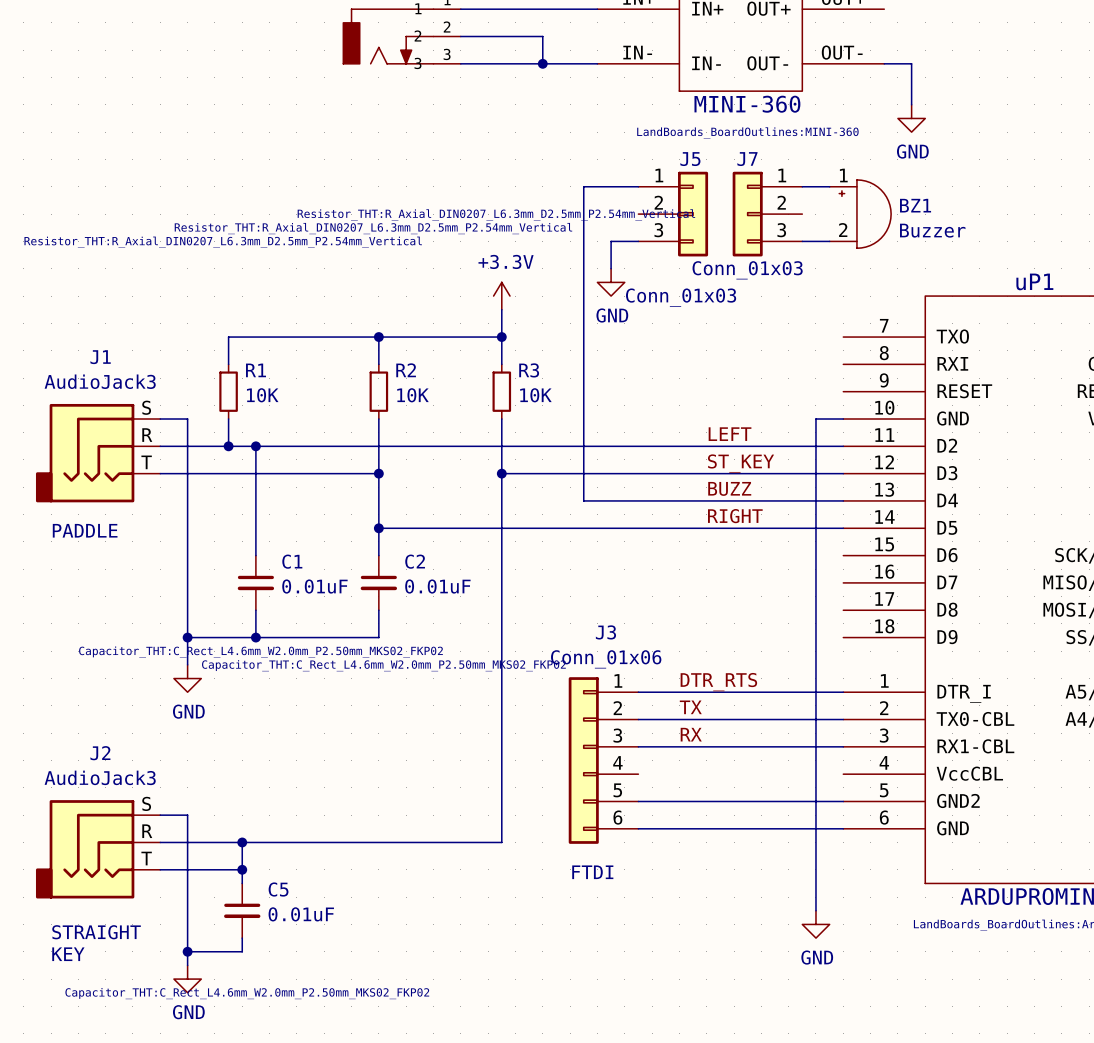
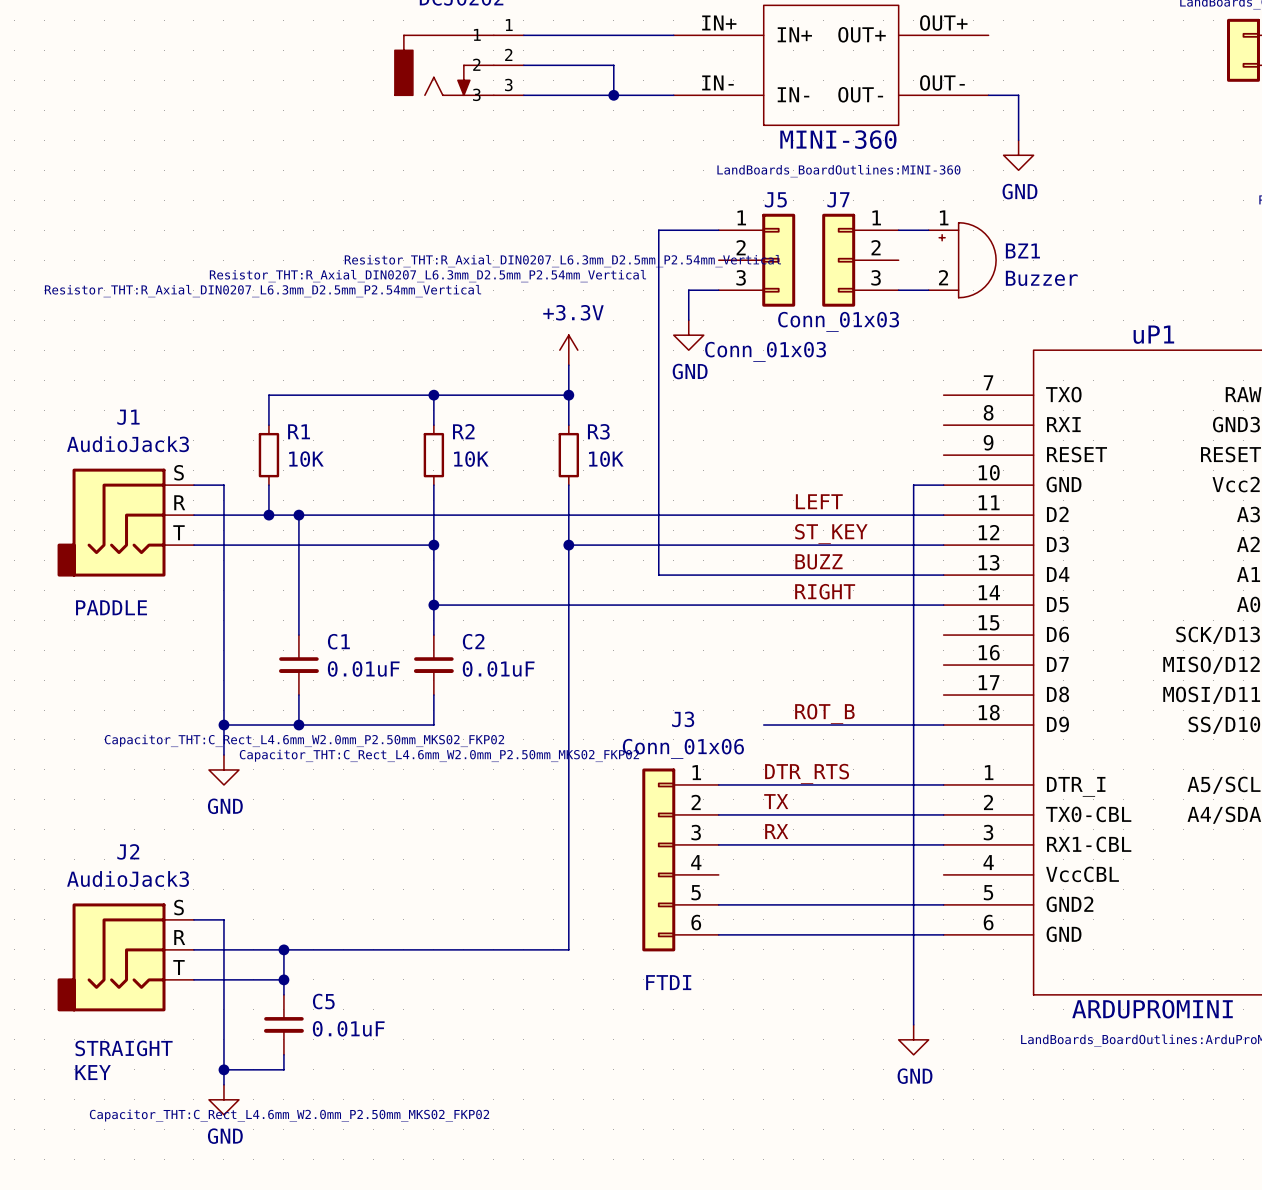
label: none -> ROT_B (824, 713)
wire: none -> (763, 725) (943, 725)

